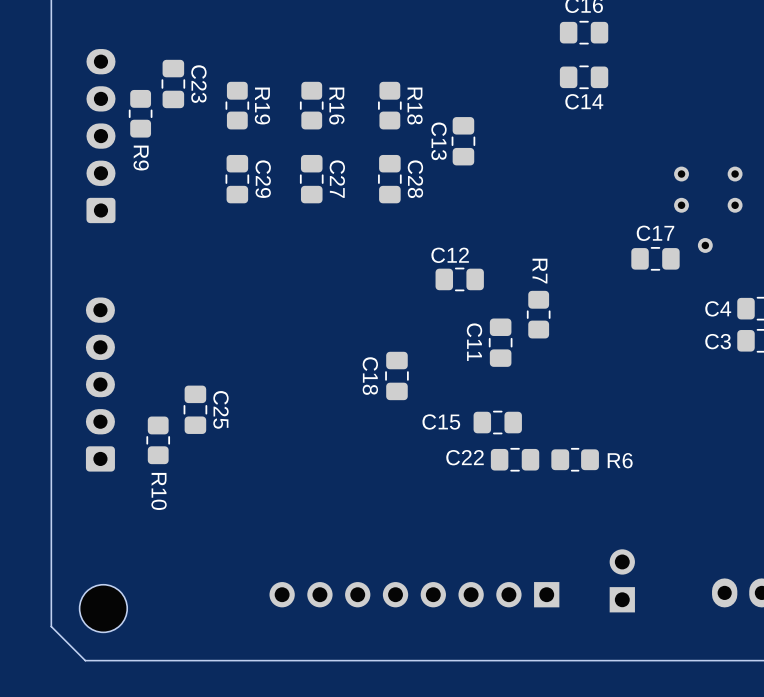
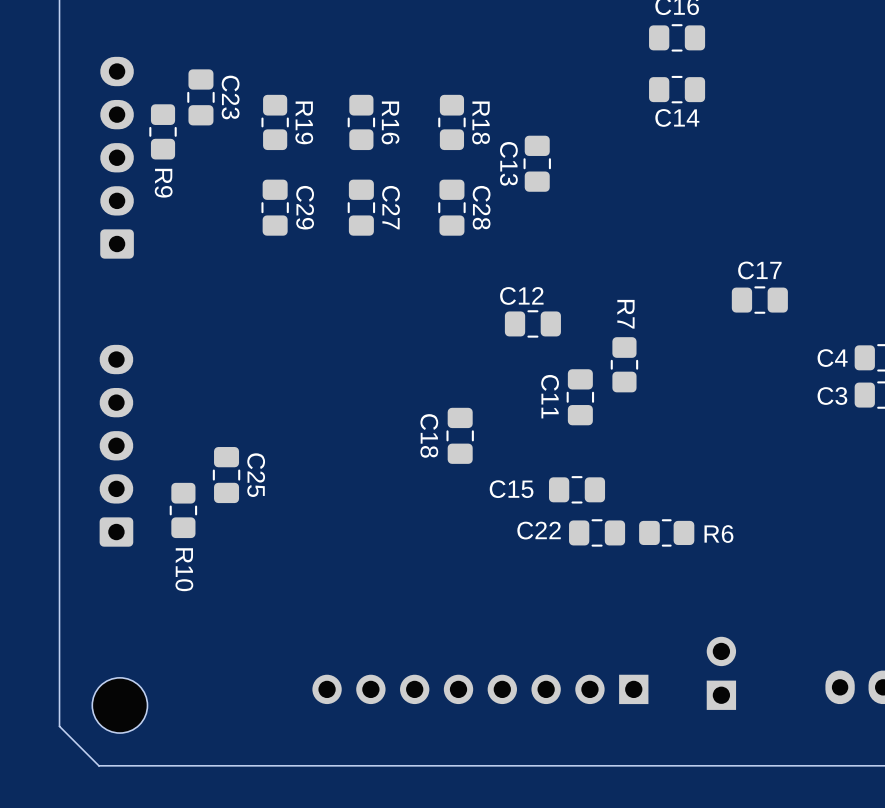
part: (681, 174) -> none
part: (735, 174) -> none
part: (681, 205) -> none
part: (735, 205) -> none
part: (705, 245) -> none

